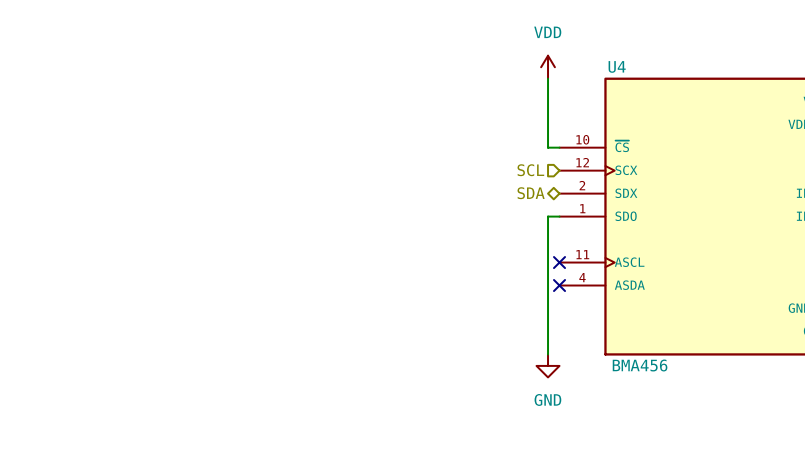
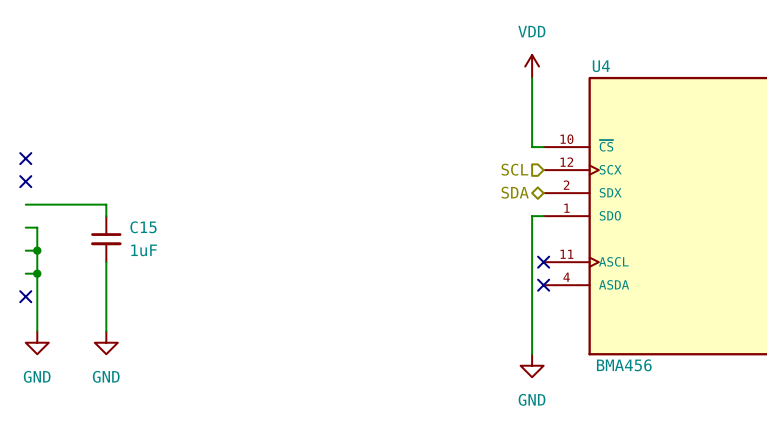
no-connect mark: none -> (25, 158)
no-connect mark: none -> (25, 181)
wire: none -> (25, 204) (106, 204) (106, 216)
wire: none -> (25, 227) (37, 227) (37, 331)
C15: none -> 1uF (106, 239)
wire: none -> (25, 250) (37, 250)
junction: none -> (37, 250)
wire: none -> (106, 262) (106, 331)
wire: none -> (25, 273) (37, 273)
junction: none -> (37, 273)
no-connect mark: none -> (25, 296)
power symbol: none -> GND (37, 342)
power symbol: none -> GND (106, 342)

